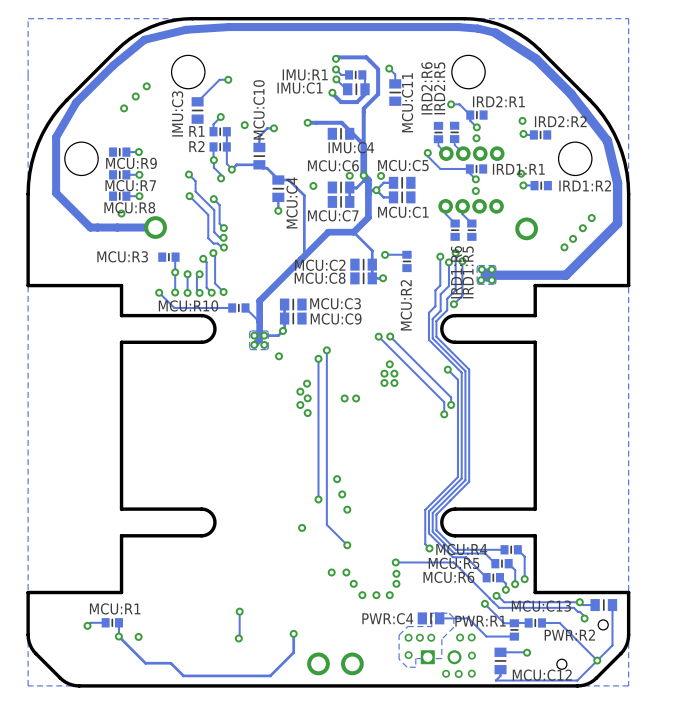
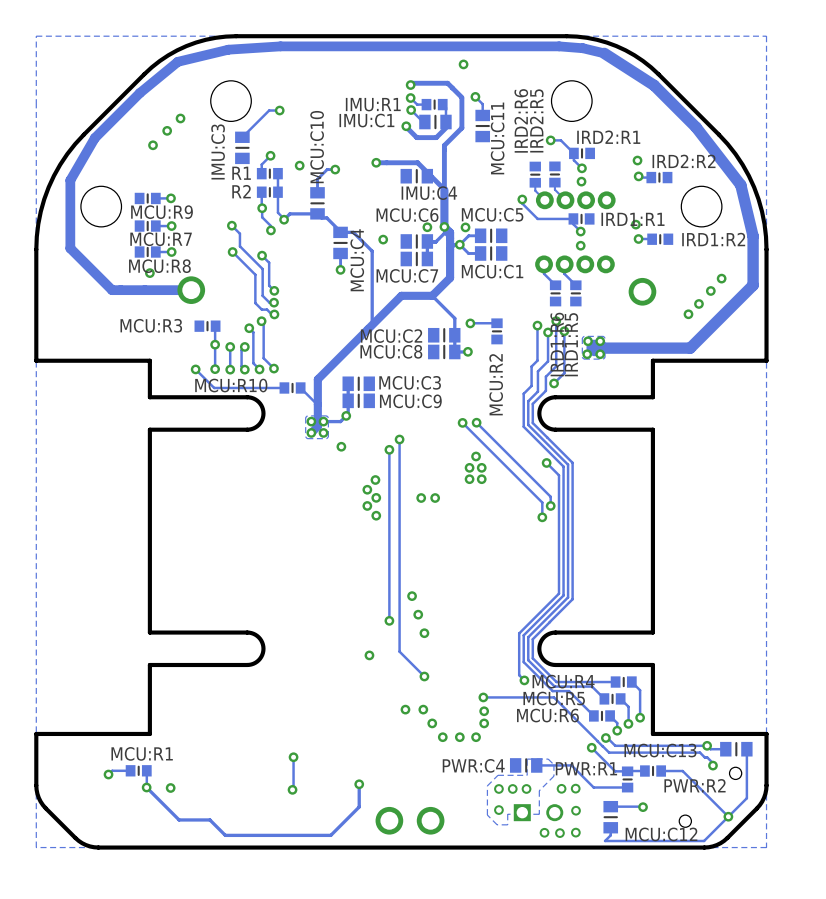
via: none -> (463, 64)

